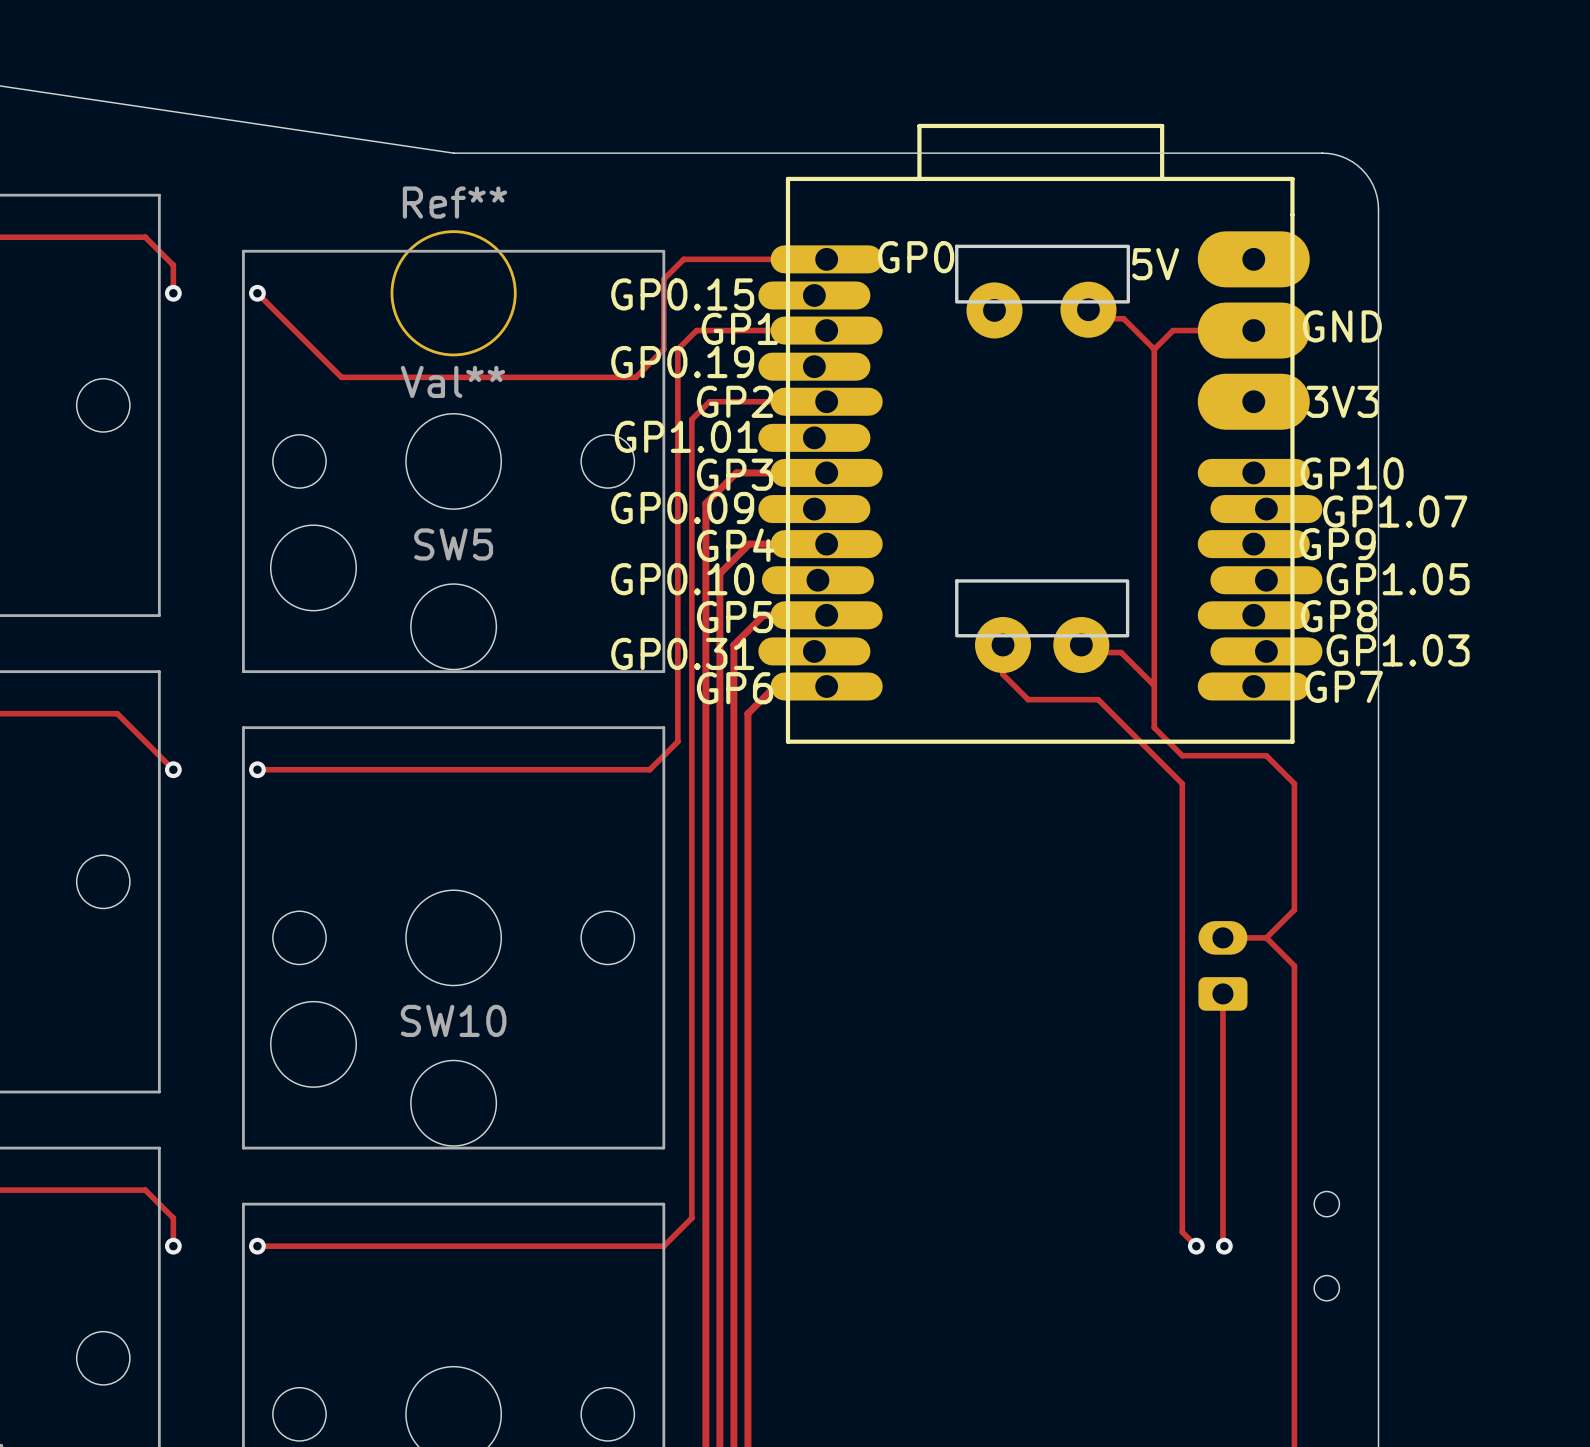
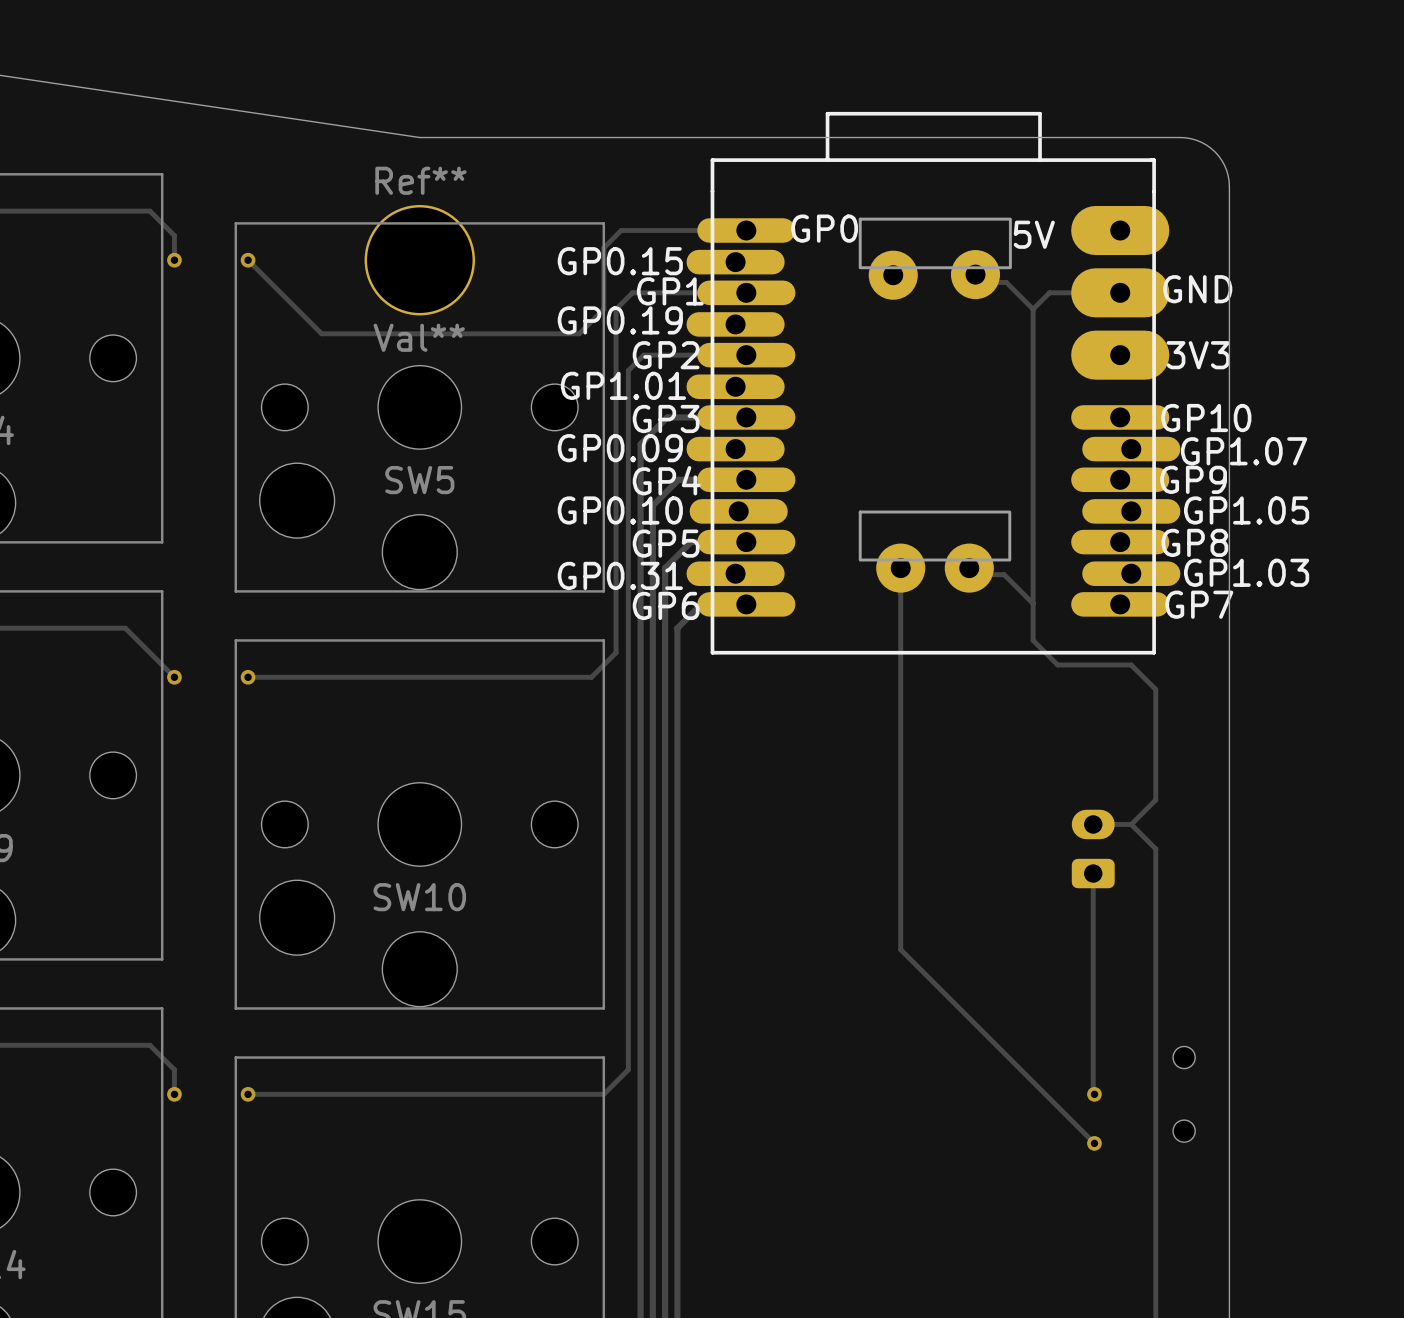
track: (1003, 674) (1028, 699) (1098, 699) (1182, 783) (1182, 1232) (1196, 1246) -> (900, 593) (900, 949) (1094, 1143)
via position: (1196, 1246) -> (1094, 1143)

